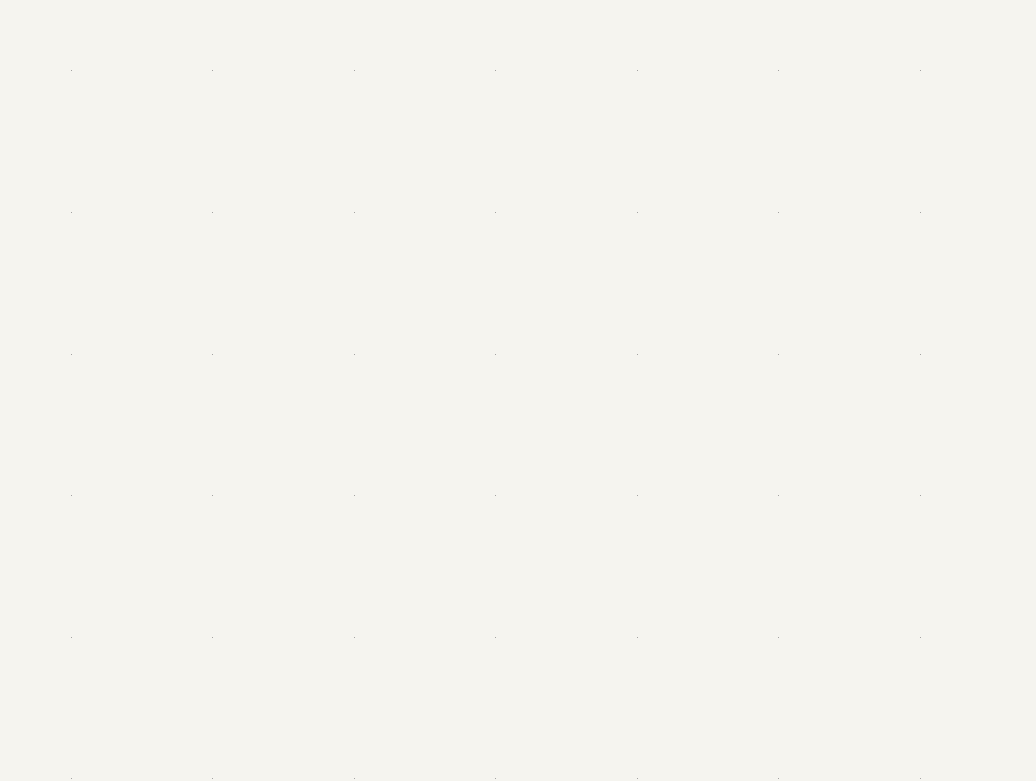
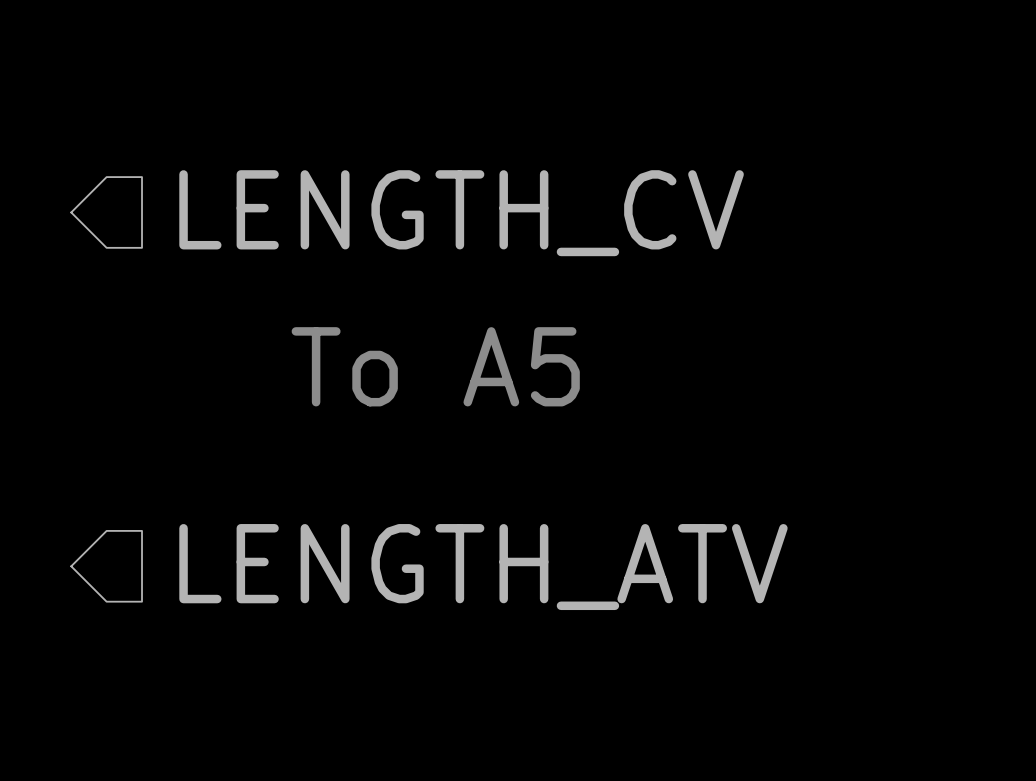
hierarchical label: none -> LENGTH_CV (461, 213)
text: none -> To A5 (435, 366)
hierarchical label: none -> LENGTH_ATV (483, 567)

